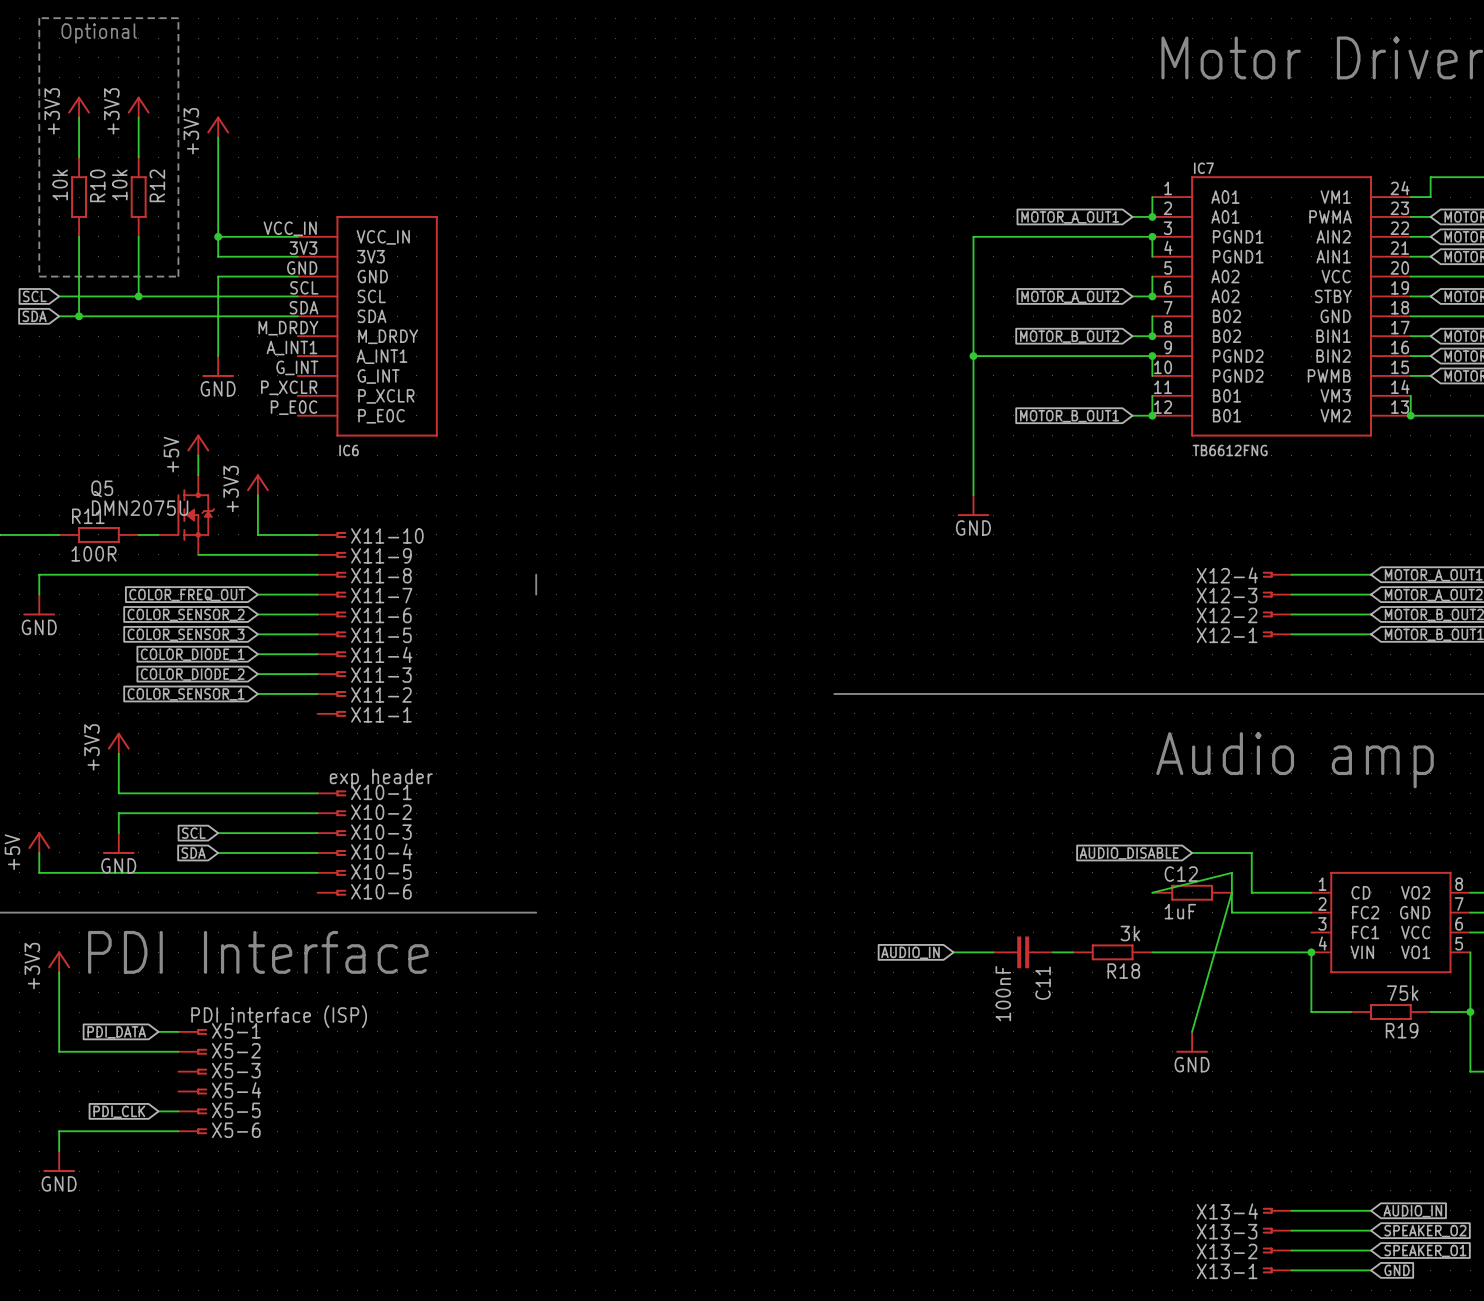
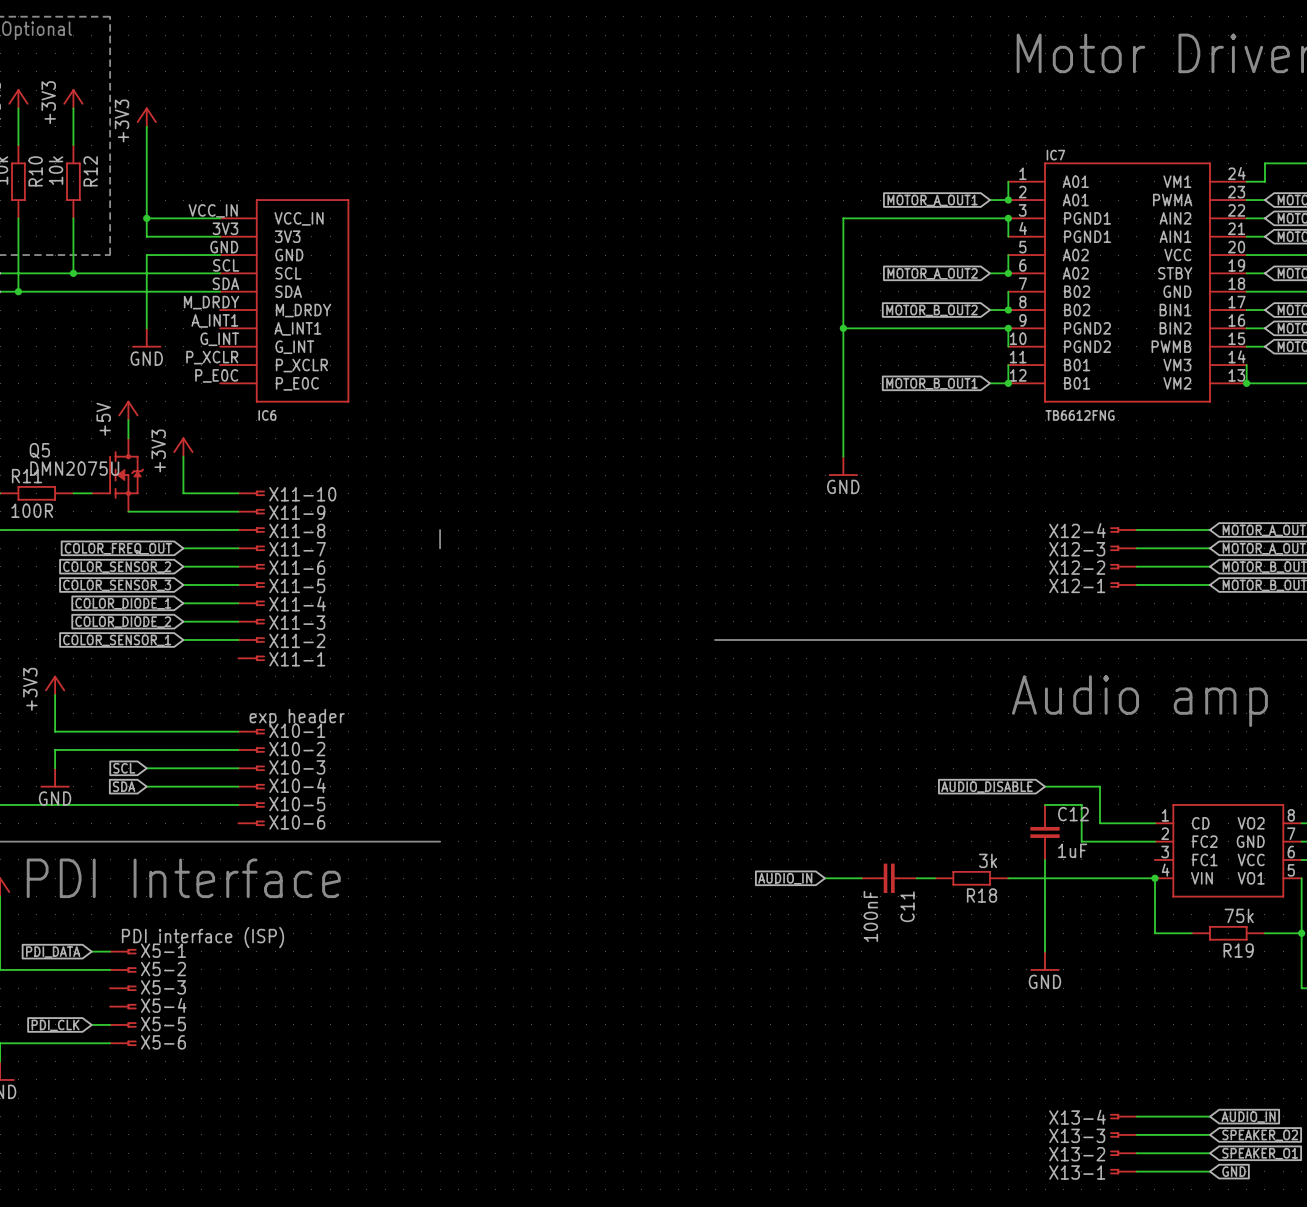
wire: (1231, 872) (1152, 892) -> (1081, 804) (1045, 804)
C12 name position: C12 (1181, 874) -> C12 (1073, 814)
C12 symbol: [1152, 884, 1232, 901] -> [1030, 804, 1060, 860]
wire: (1231, 892) (1192, 1031) -> (1045, 859) (1045, 951)
C12 value position: 1uF (1180, 911) -> 1uF (1072, 850)

